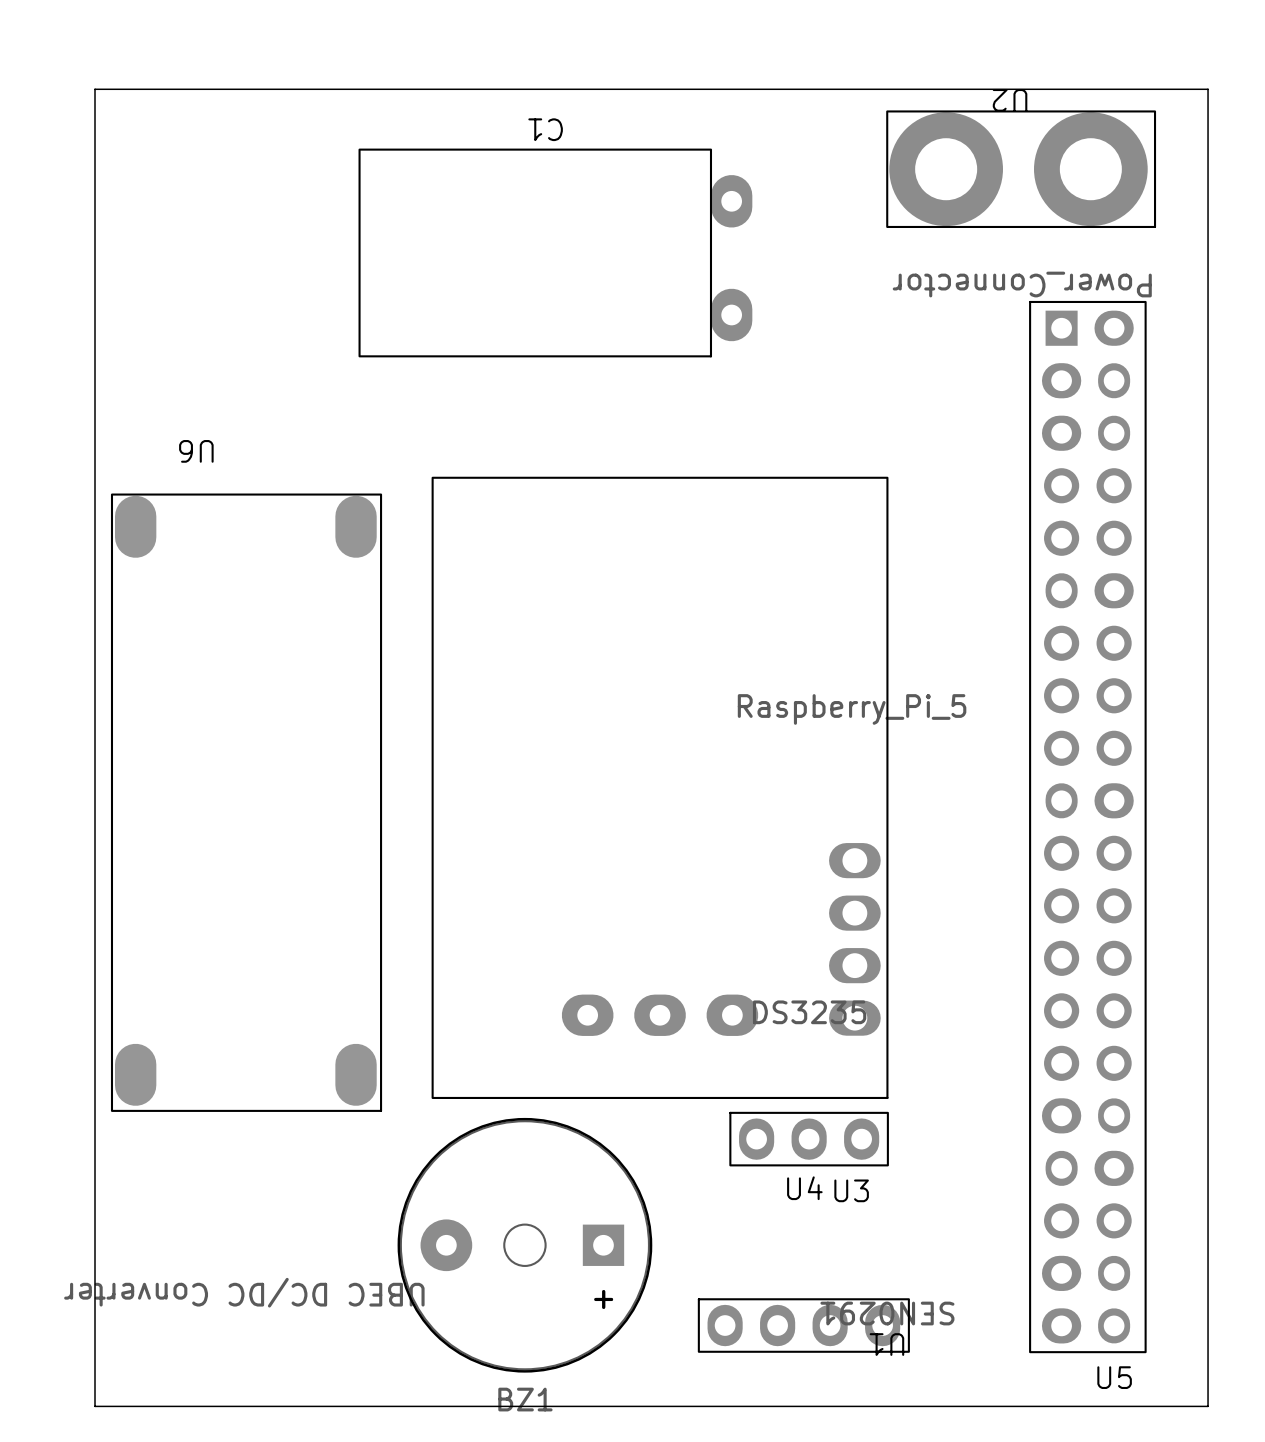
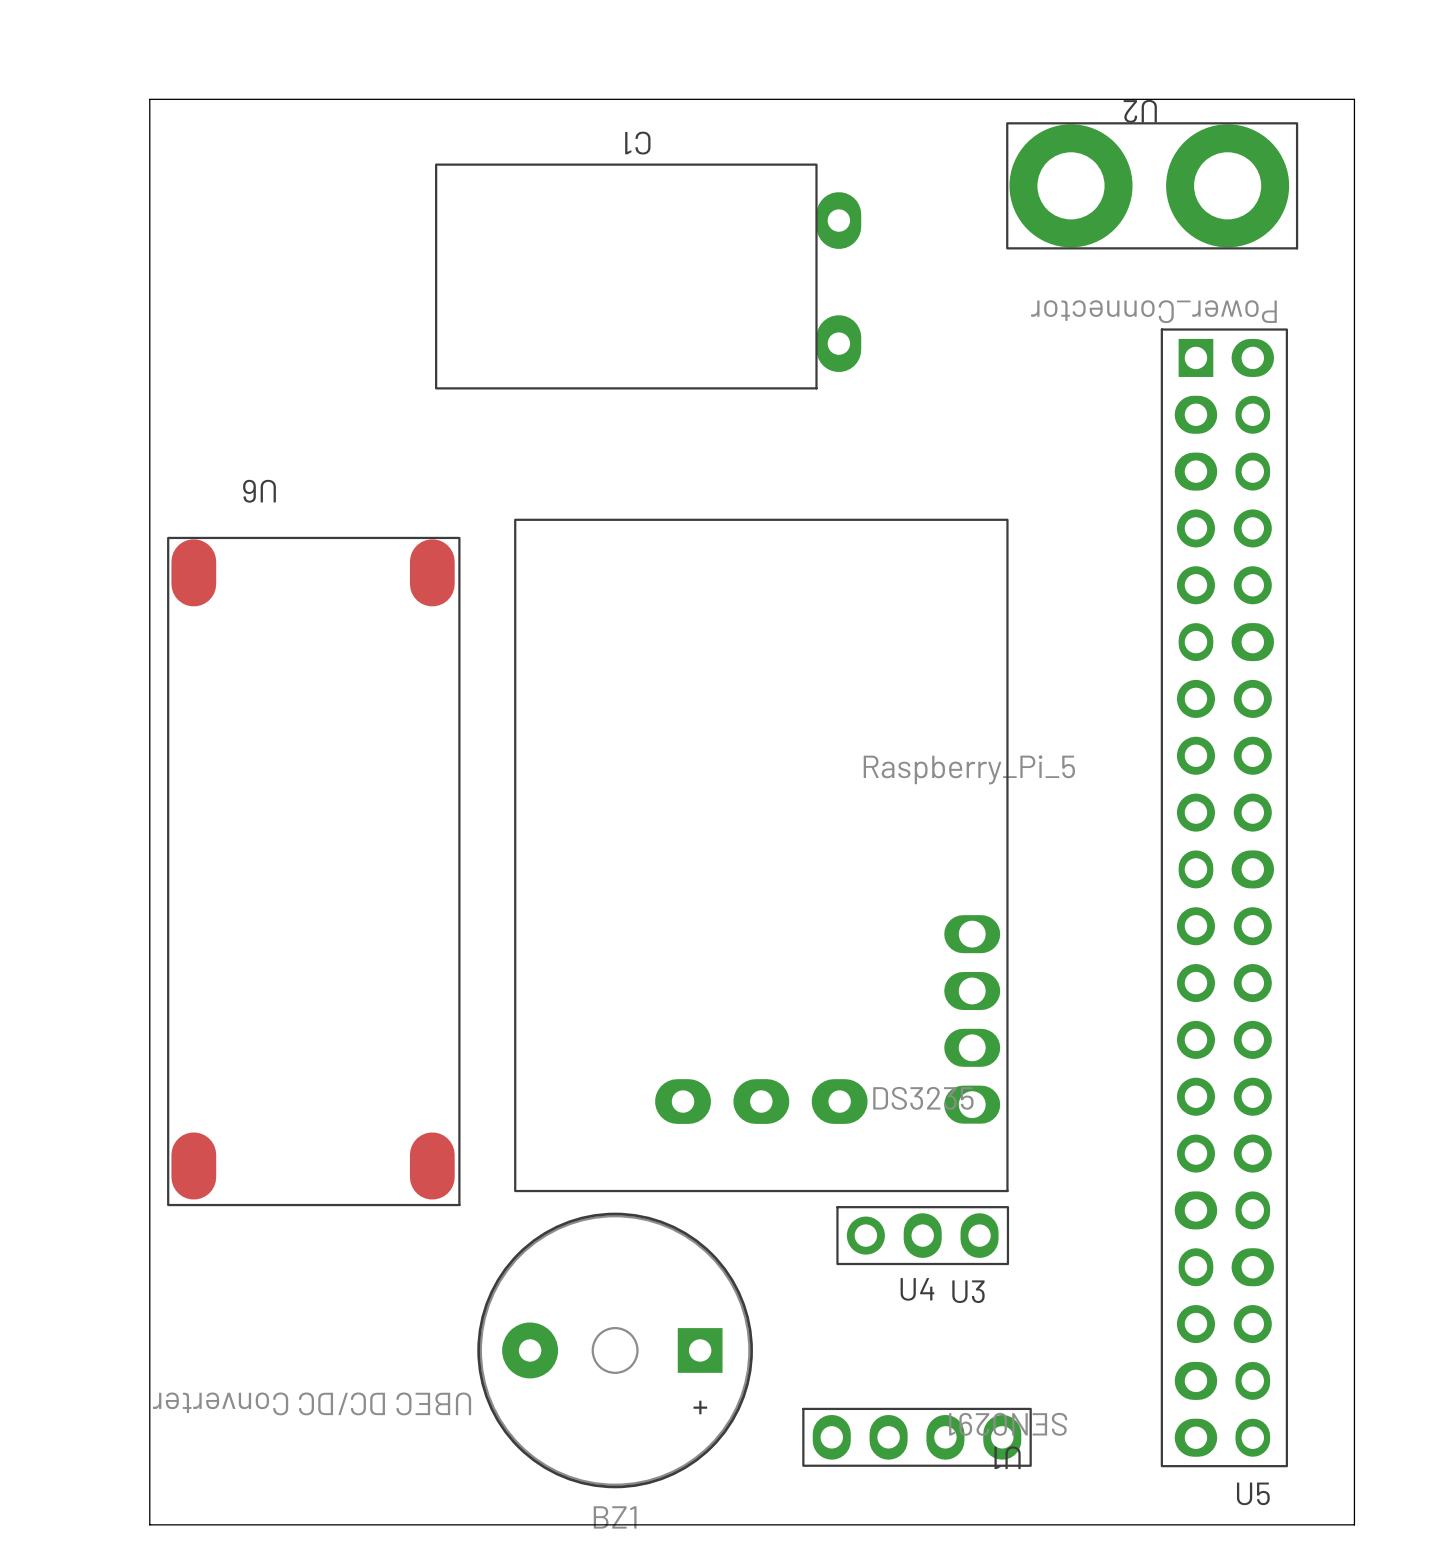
U3 footprint: [729, 1111, 889, 1167] -> [836, 1206, 1010, 1266]

